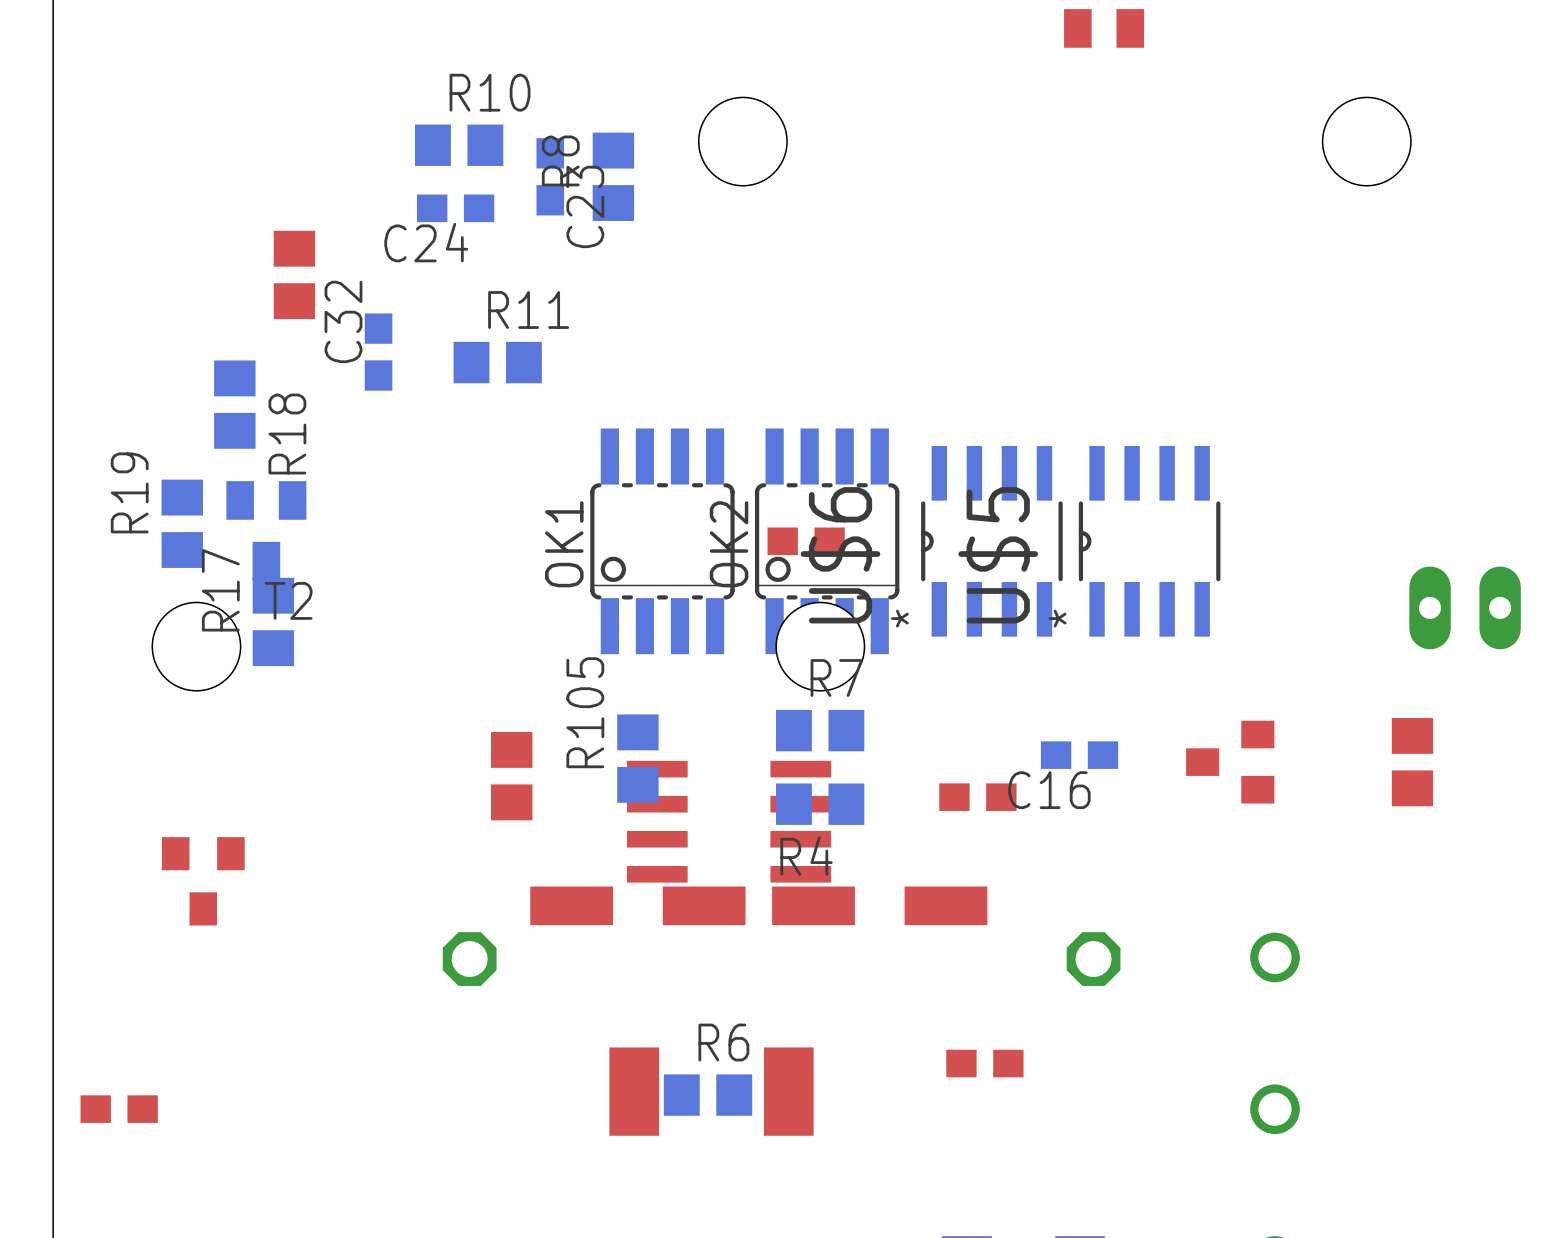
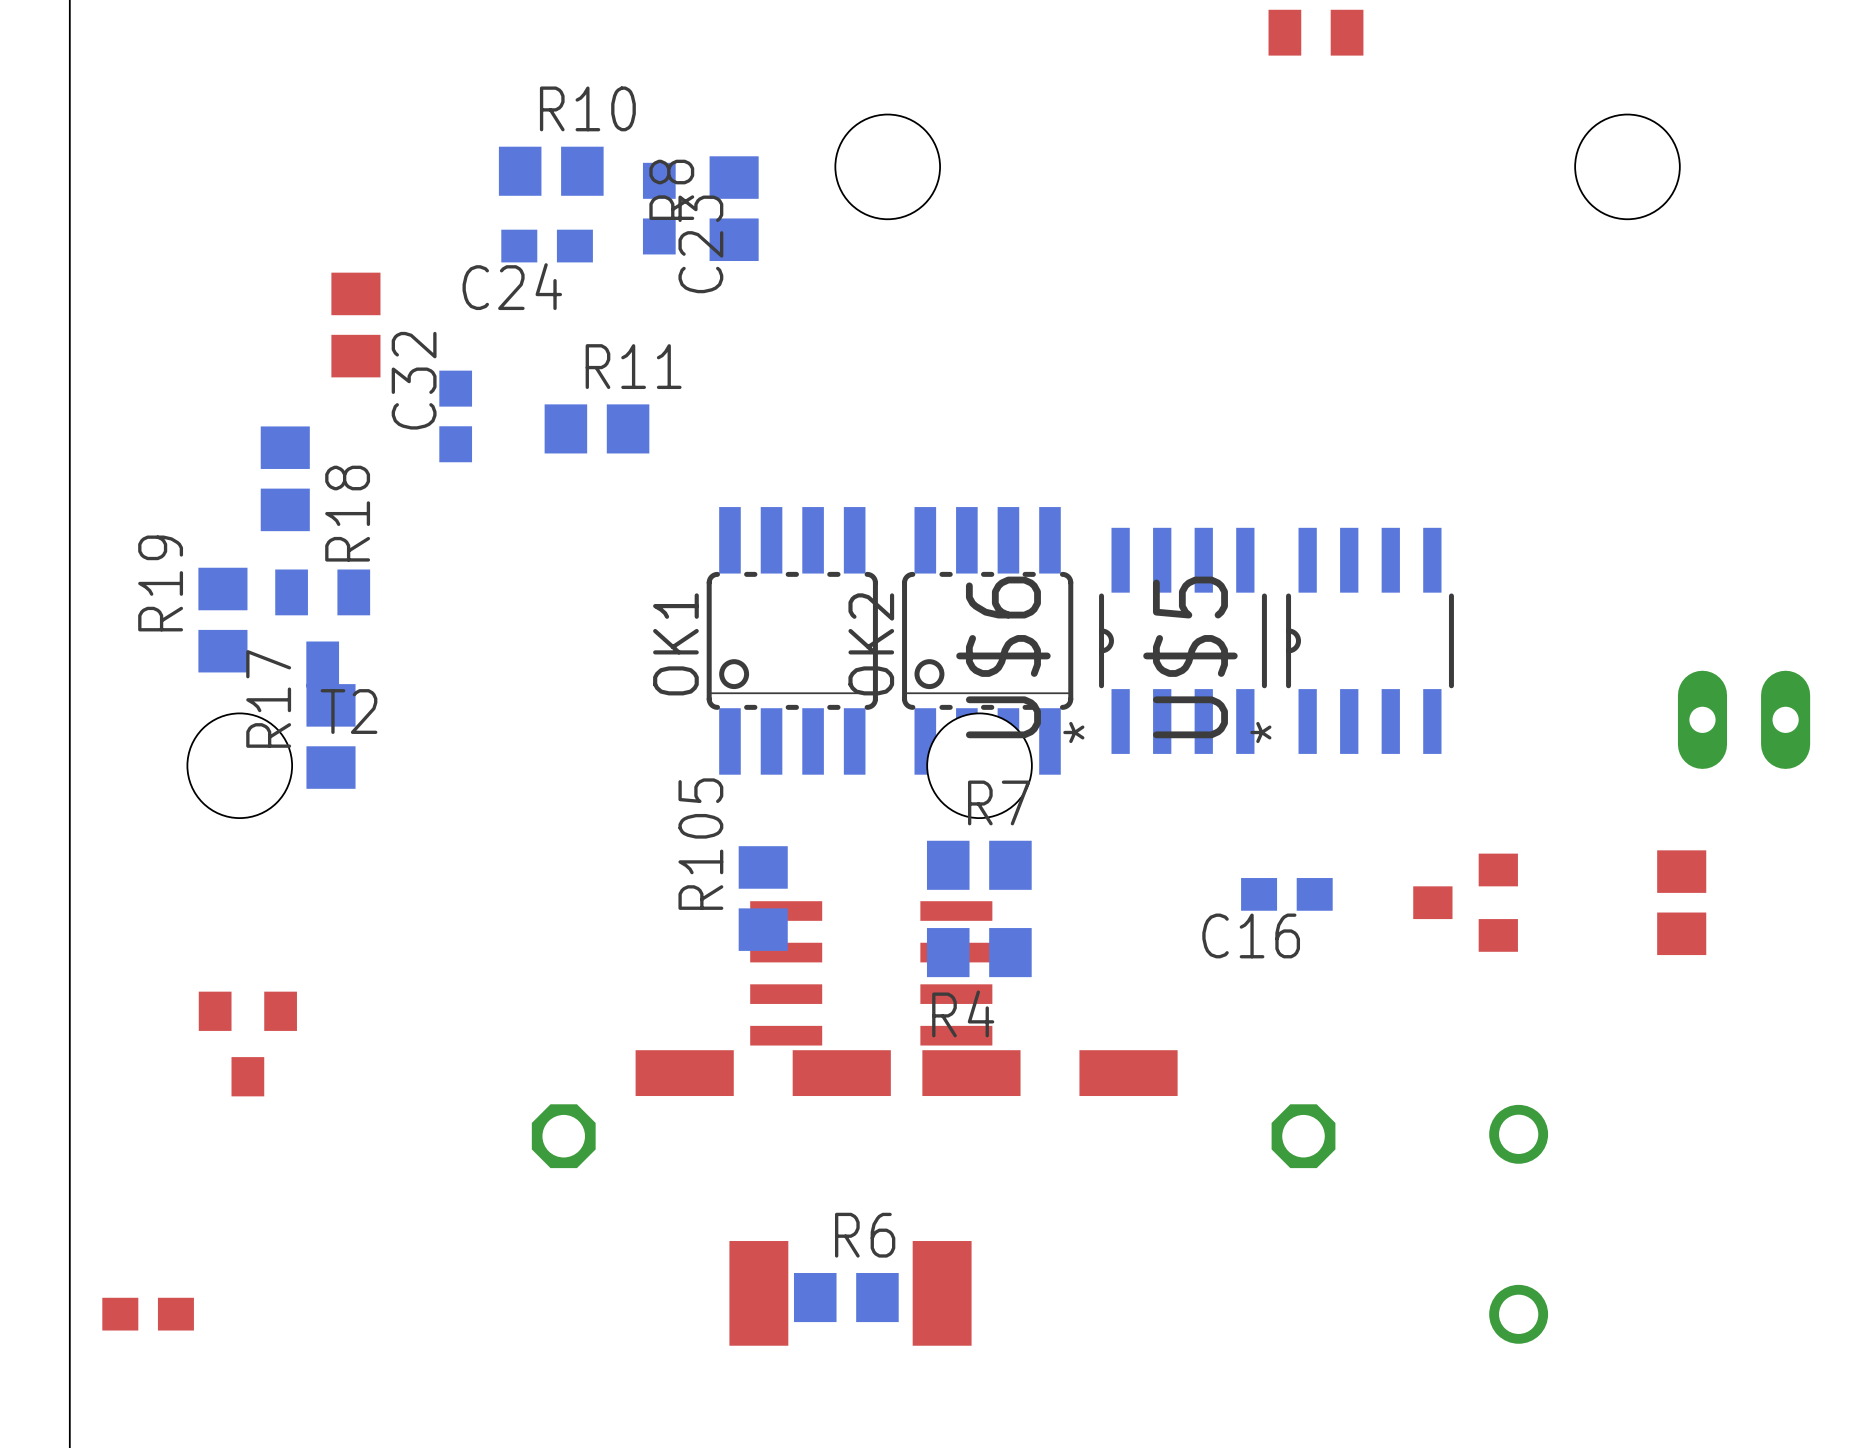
part: (806, 541) -> none
part: (511, 776) -> none
part: (977, 797) -> none
part: (984, 1063) -> none

